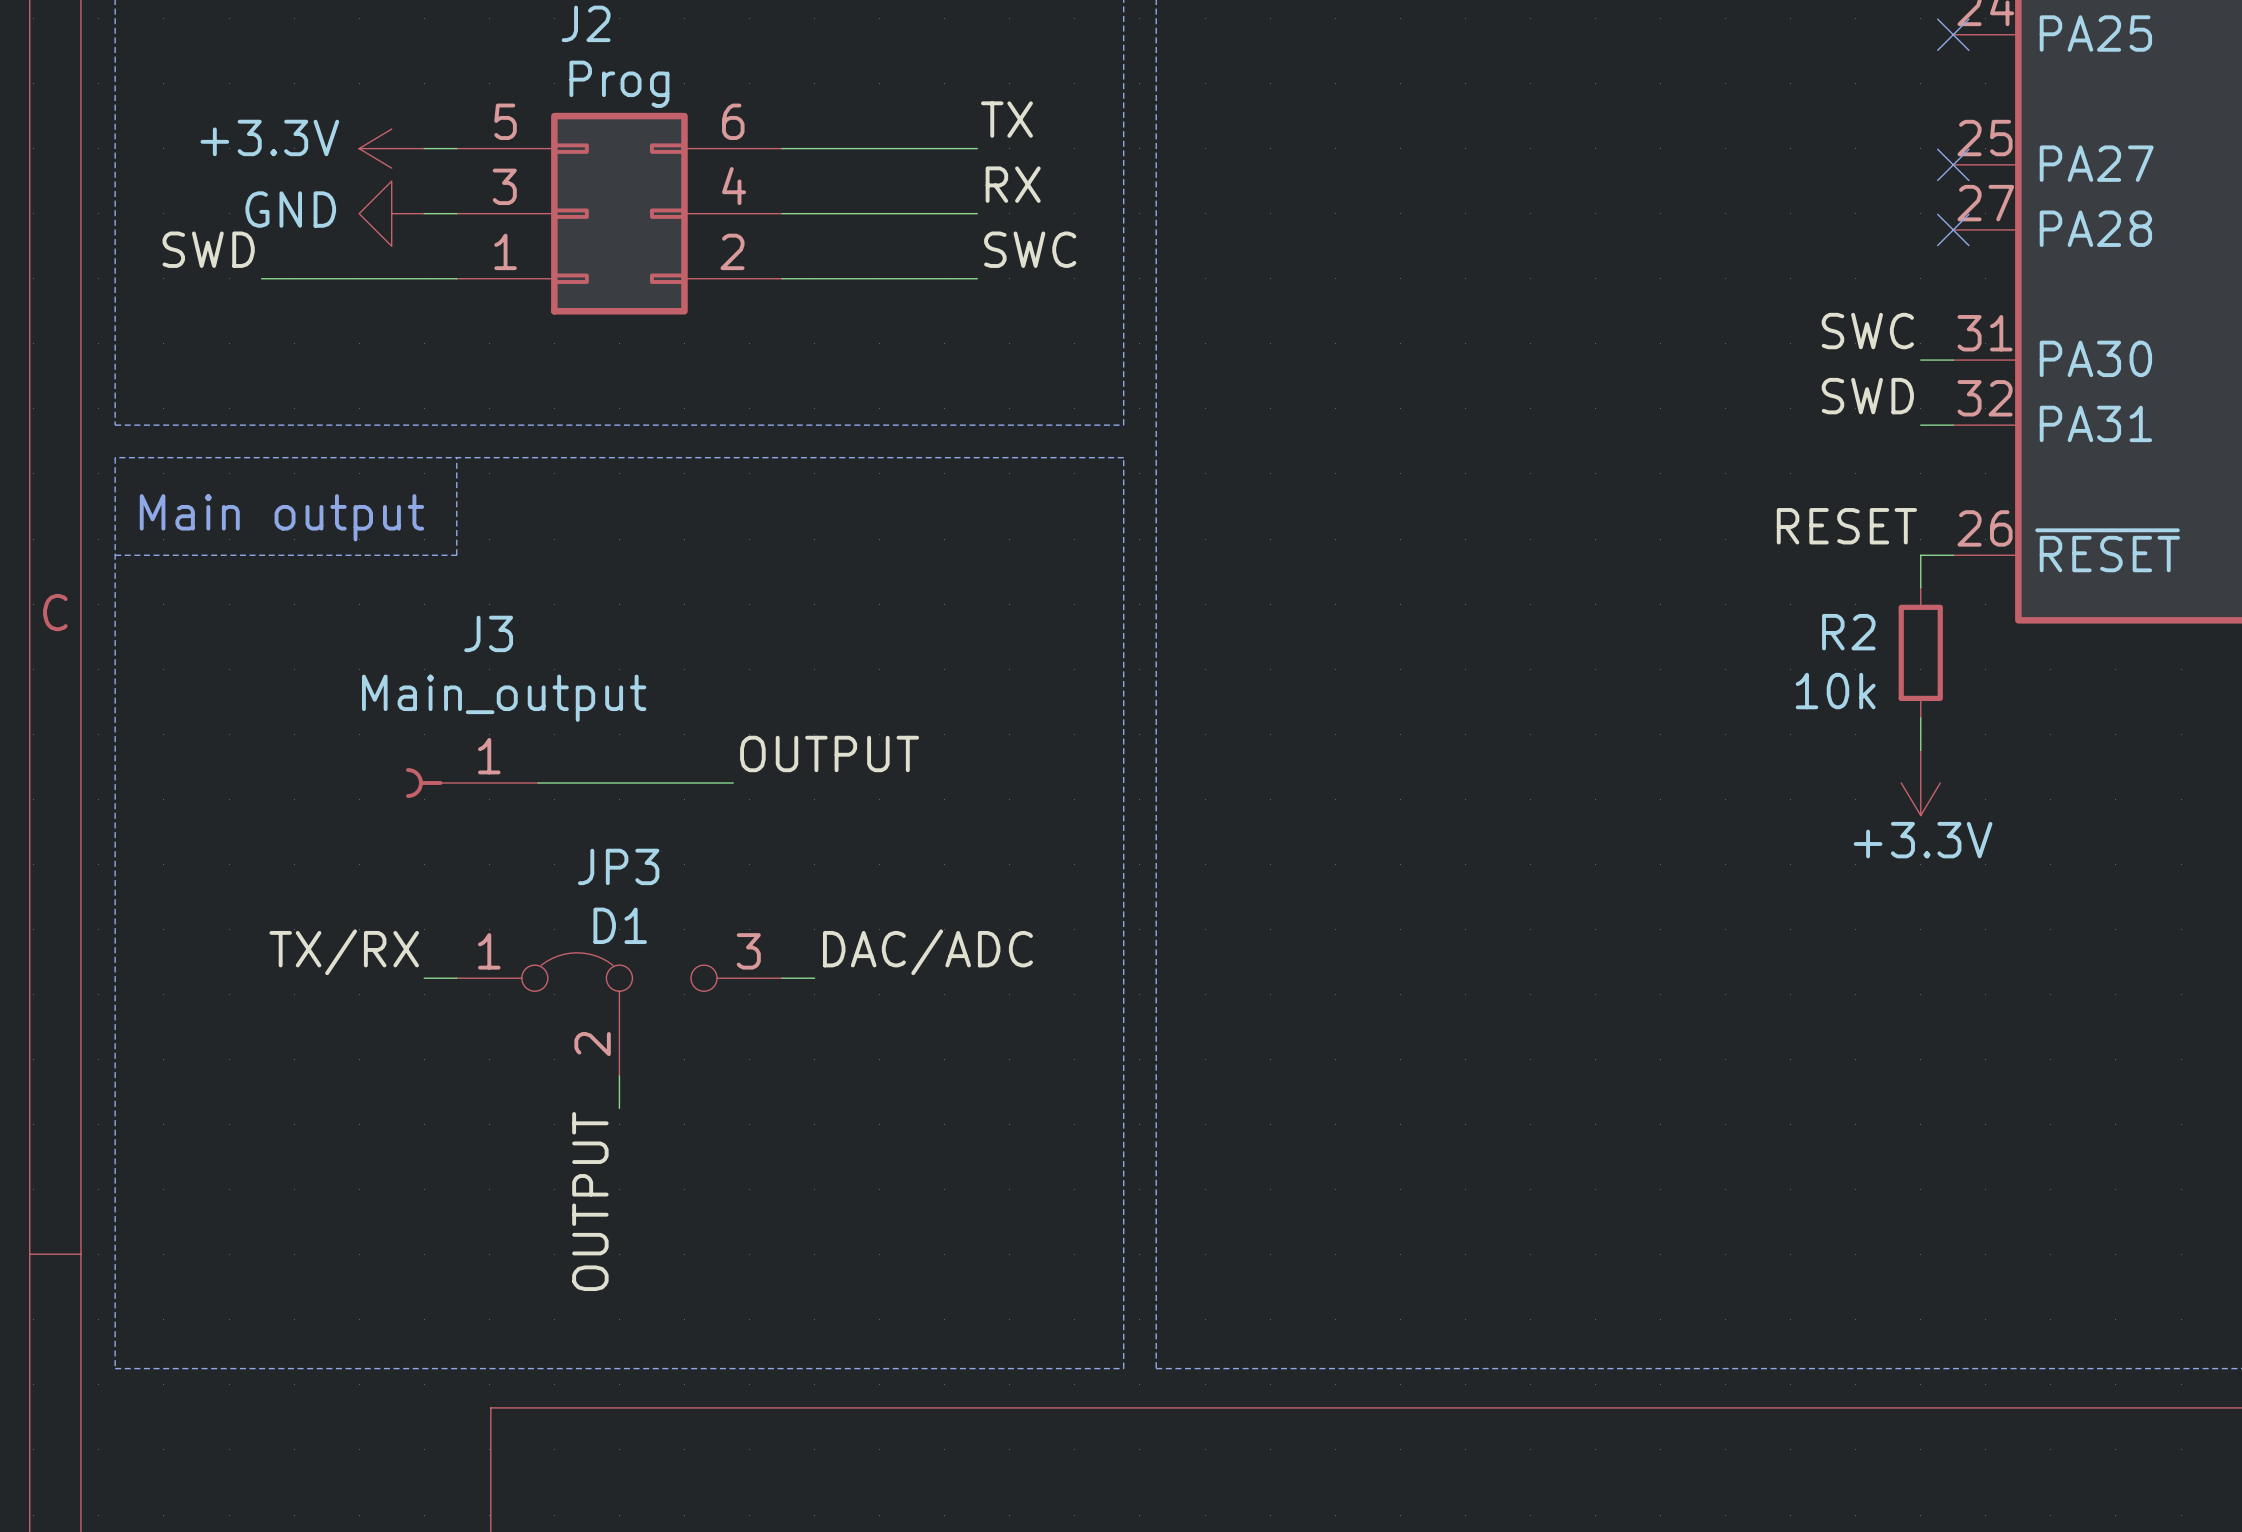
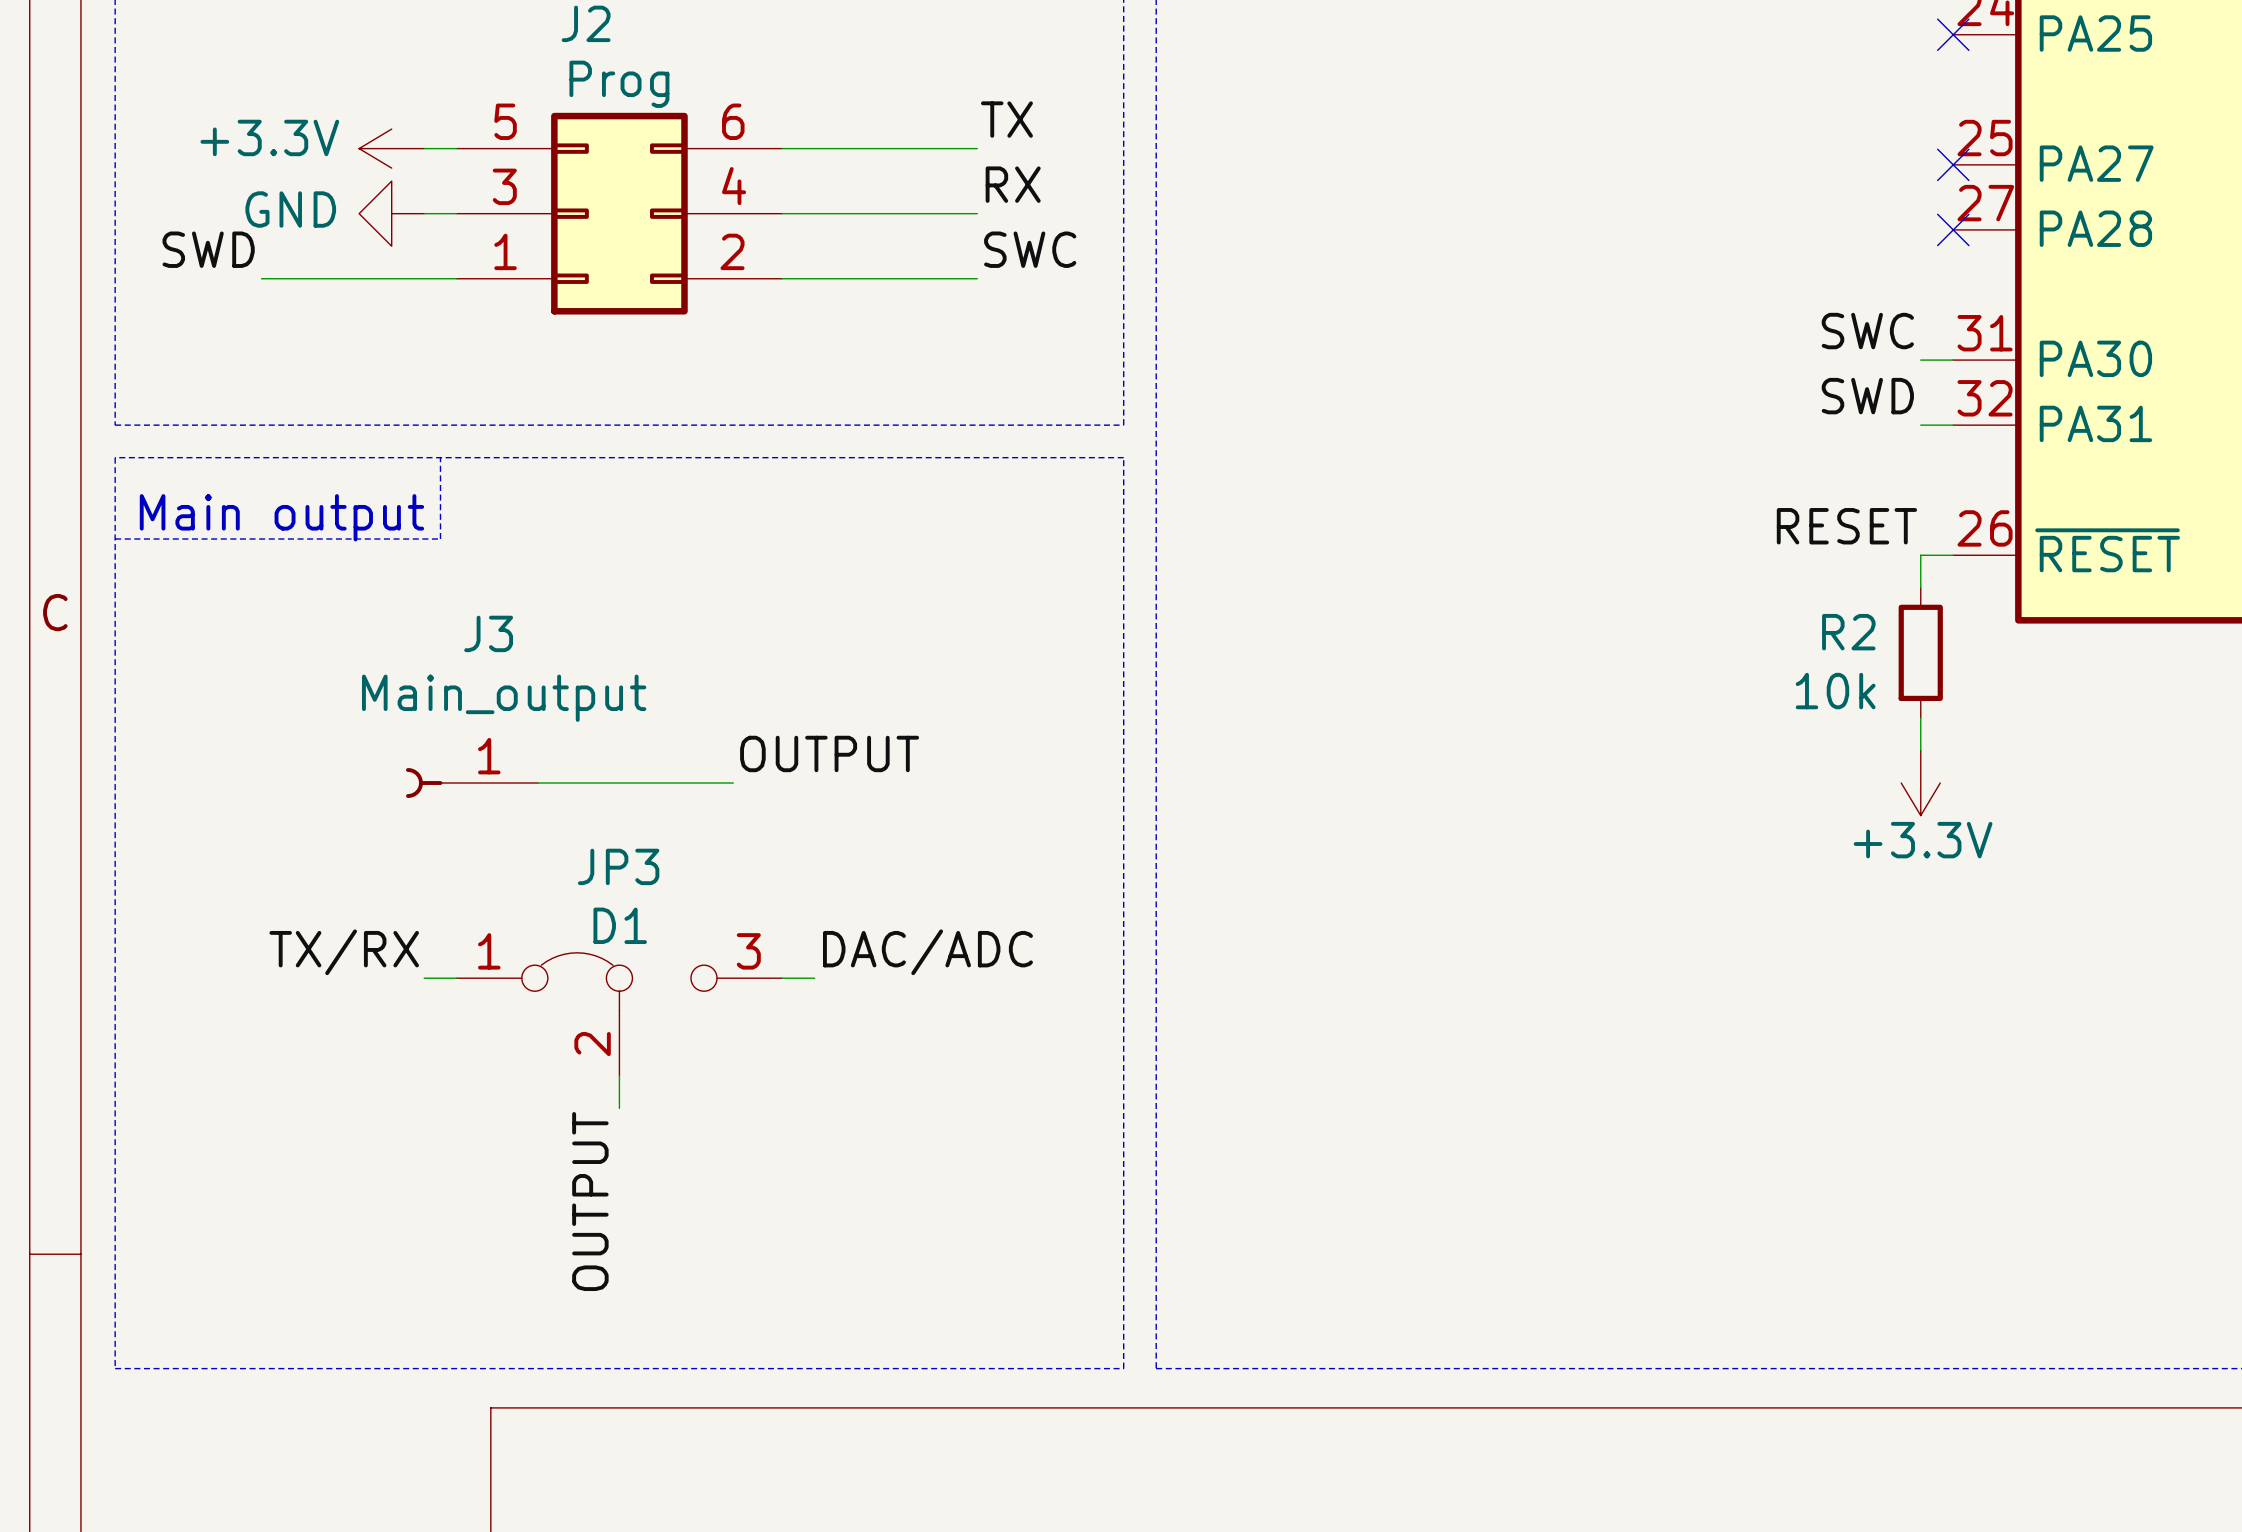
line: none -> (440, 457) (440, 539) (115, 539)
line: (456, 457) (456, 555) (115, 555) -> none

